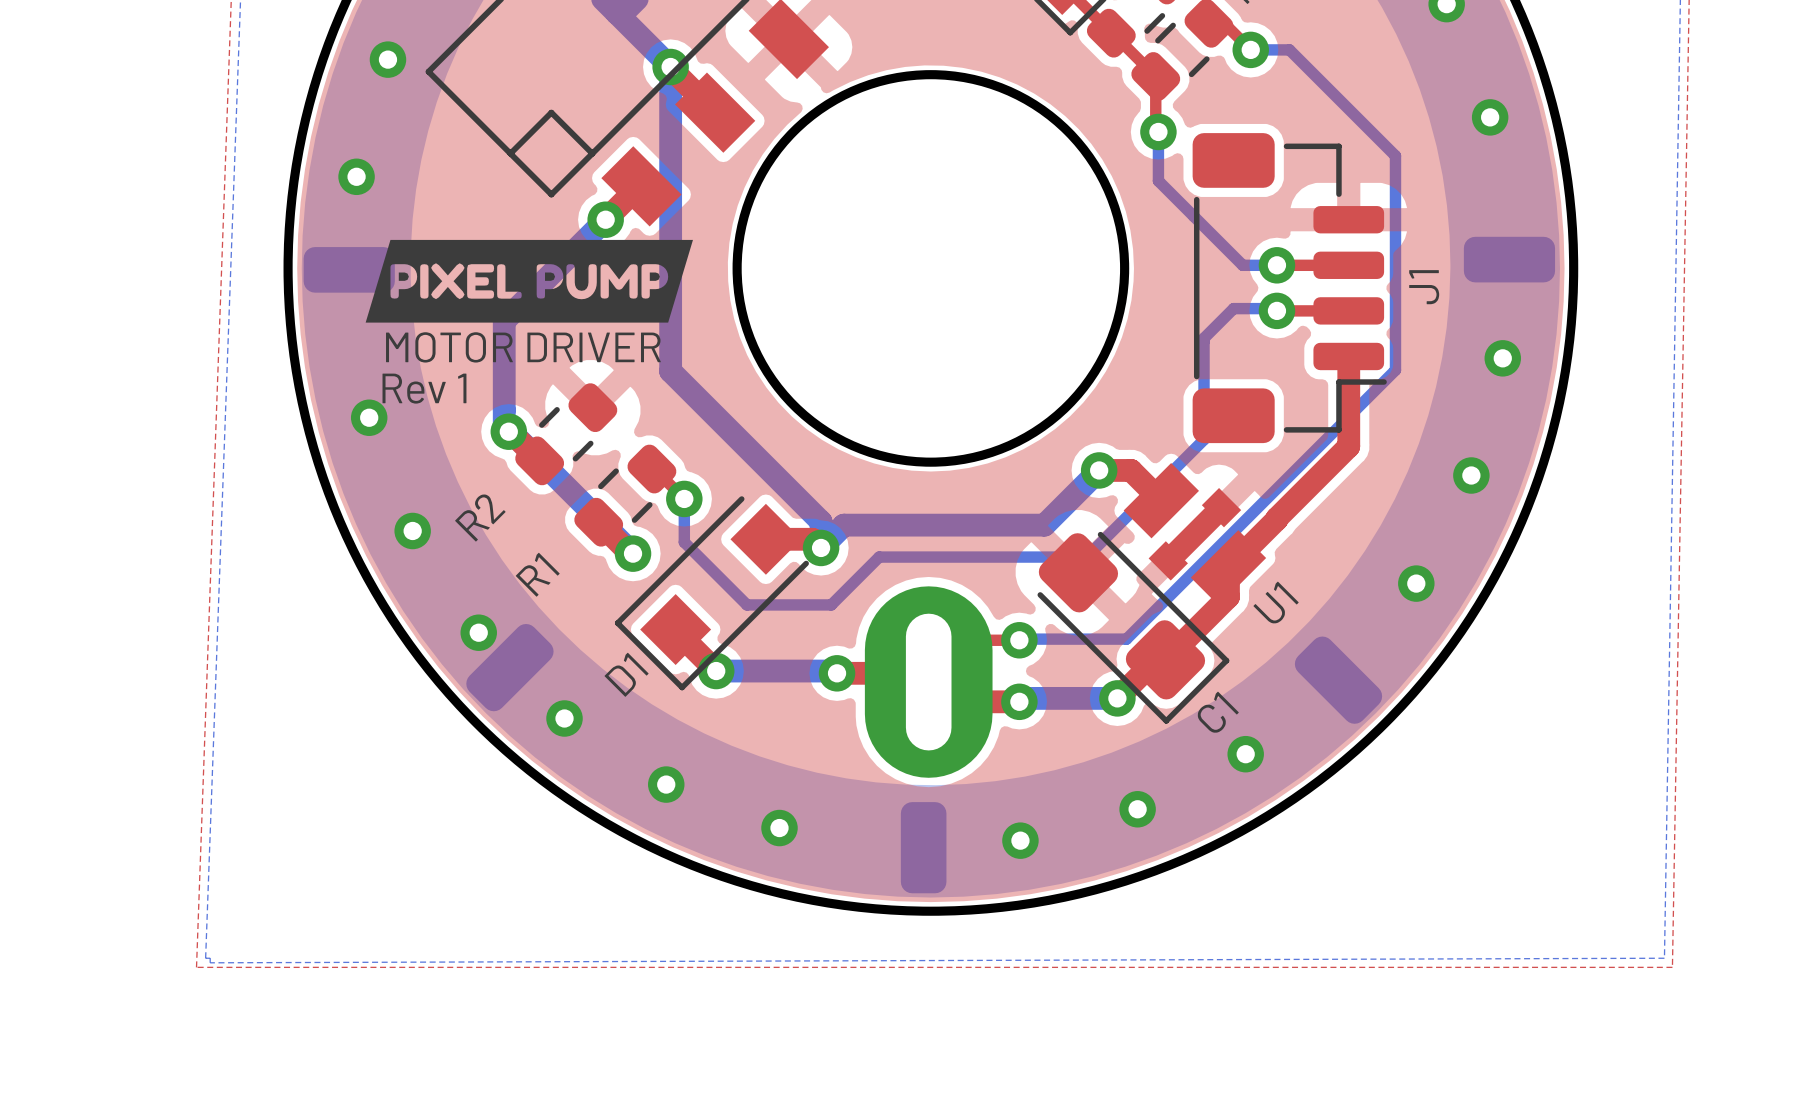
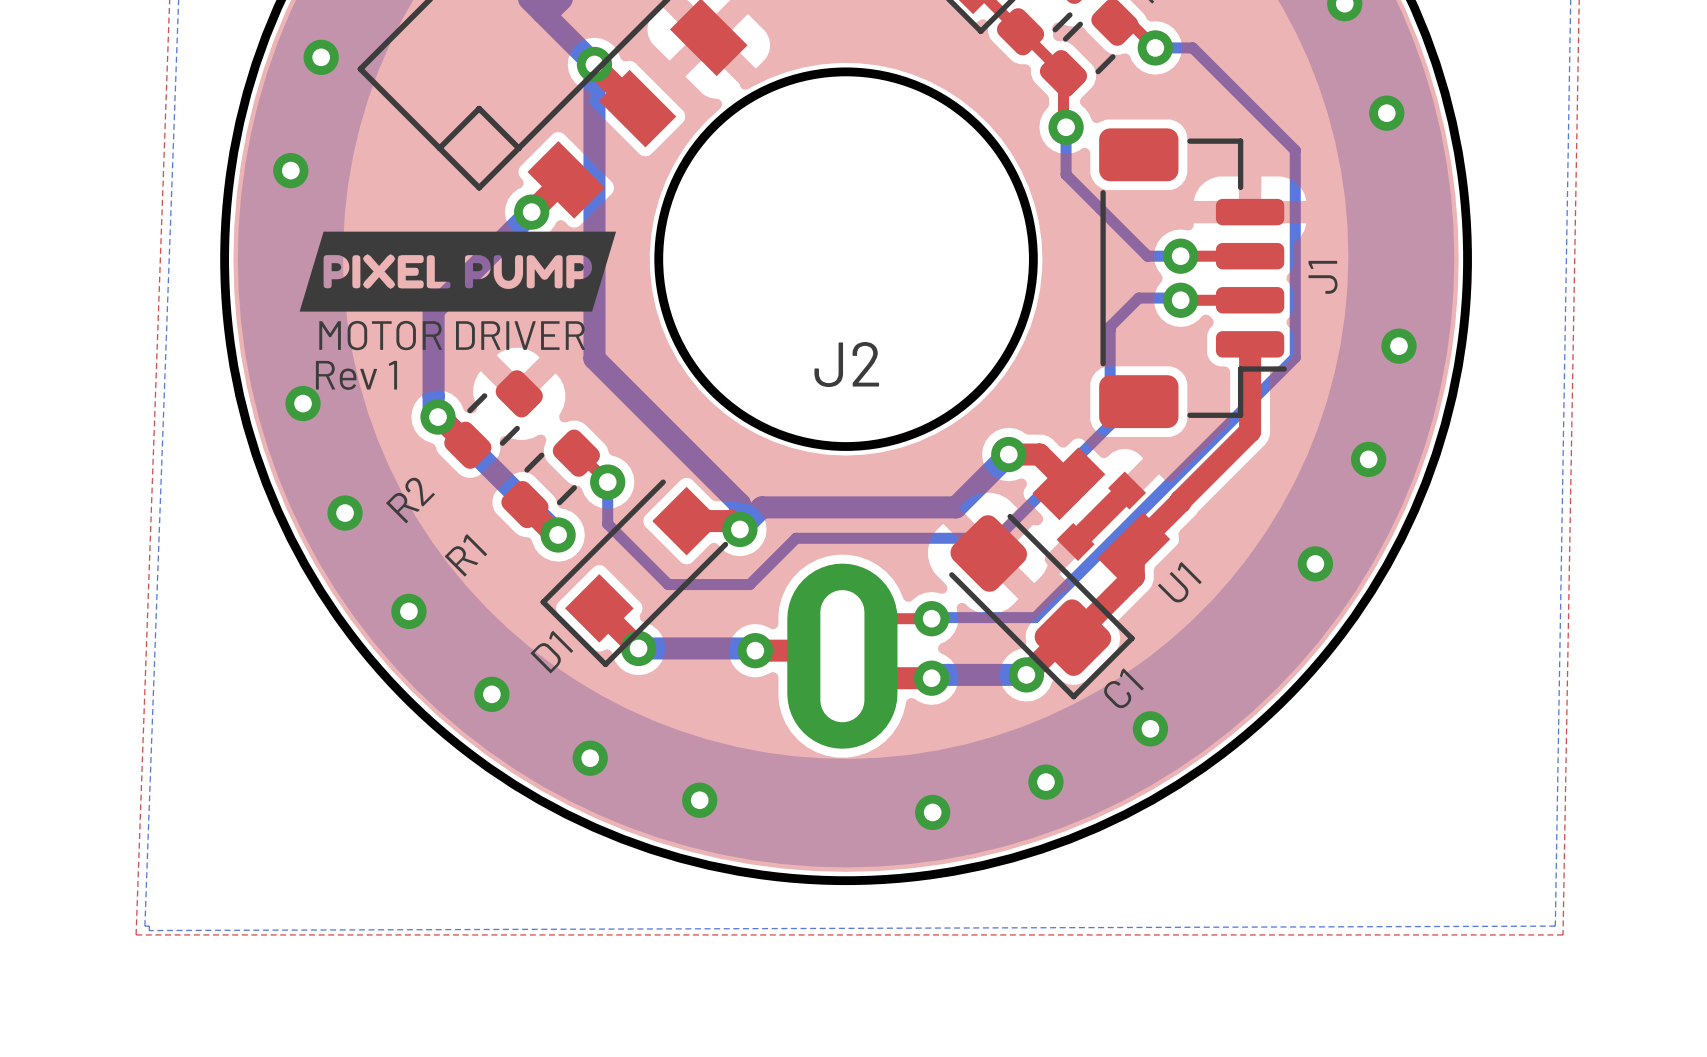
part: (1509, 259) -> none
part: (349, 269) -> none
part: (509, 667) -> none
J2: none -> (842, 656)
part: (1338, 680) -> none
part: (928, 682) -> none
part: (923, 847) -> none

